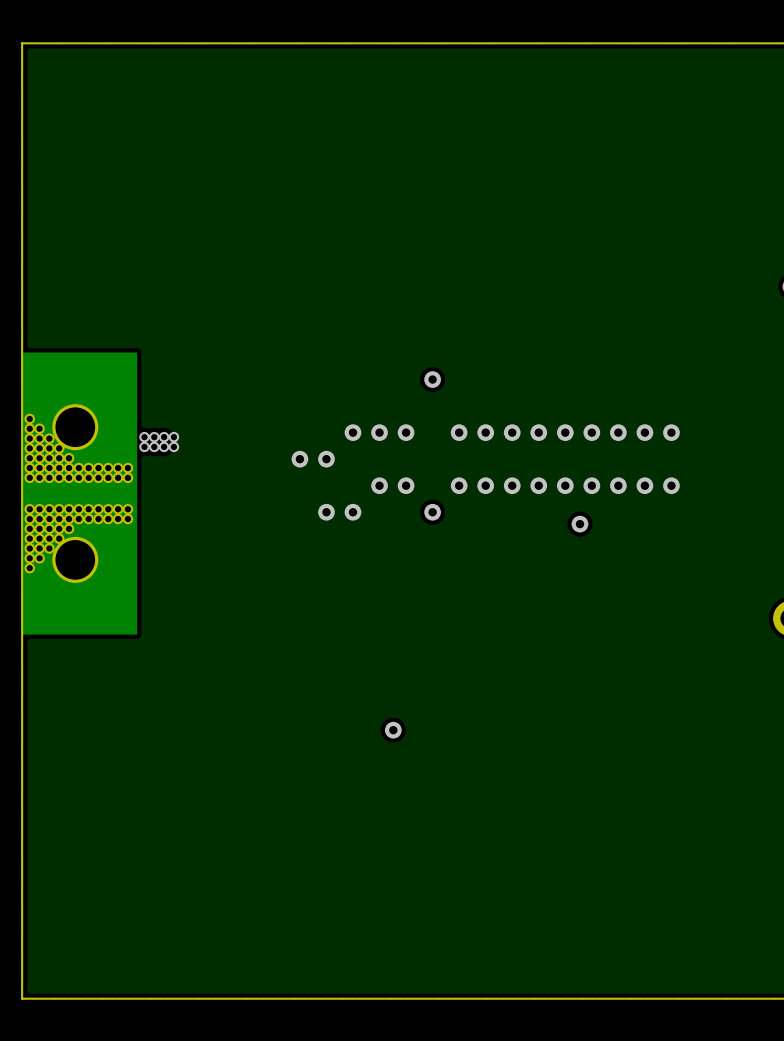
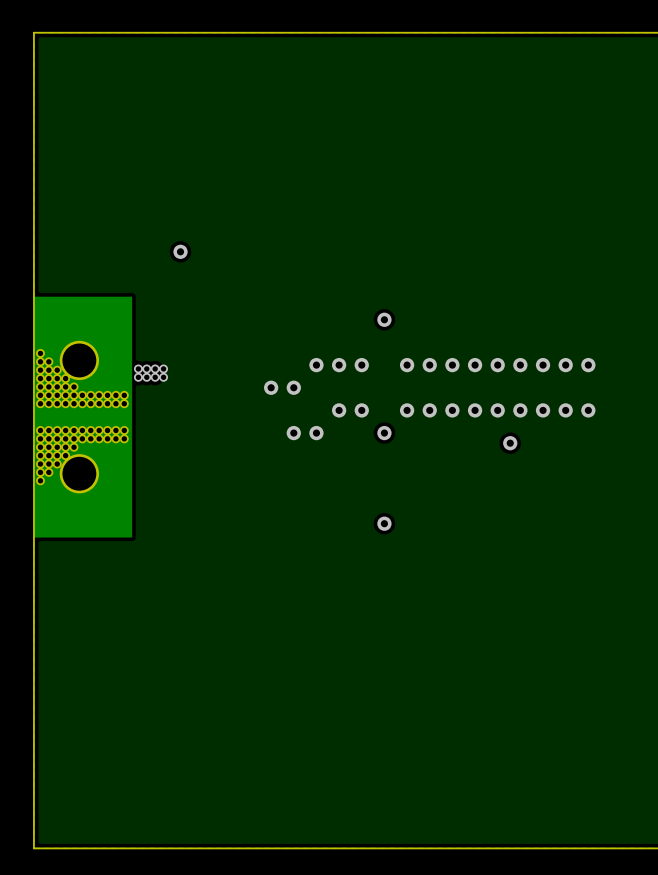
via: none -> (180, 251)
via position: (393, 730) -> (384, 523)

